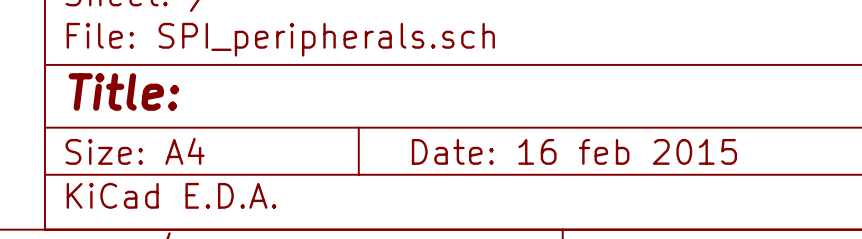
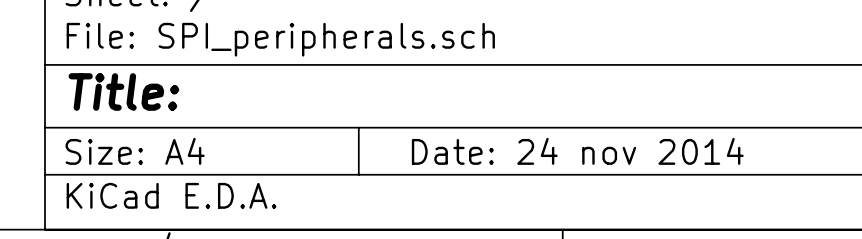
title block: Date: 16 feb 2015 (574, 151) -> Date: 24 nov 2014 (577, 151)

